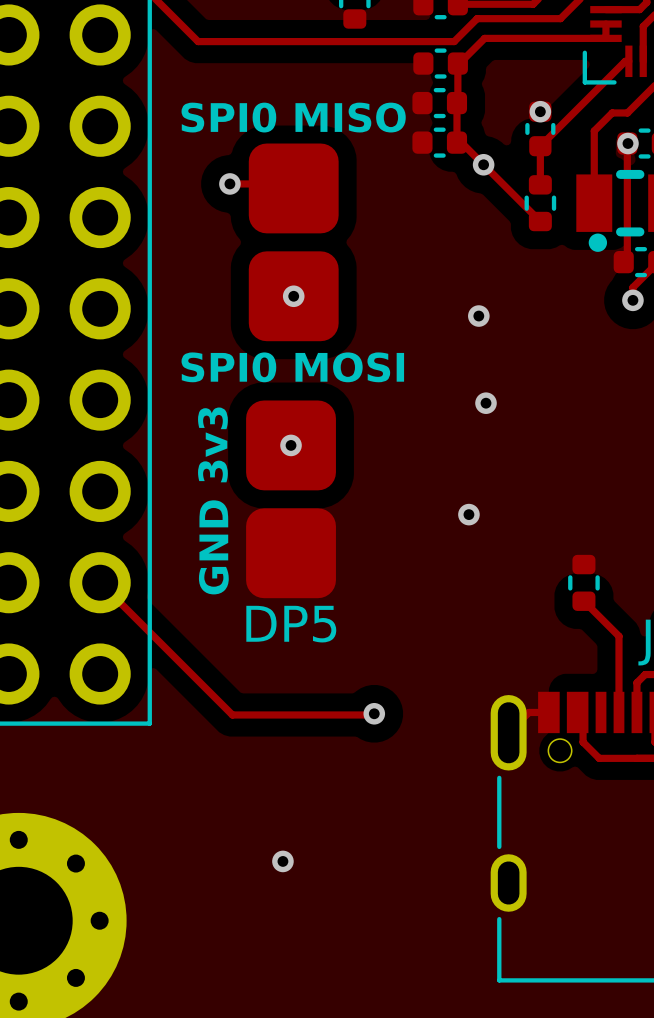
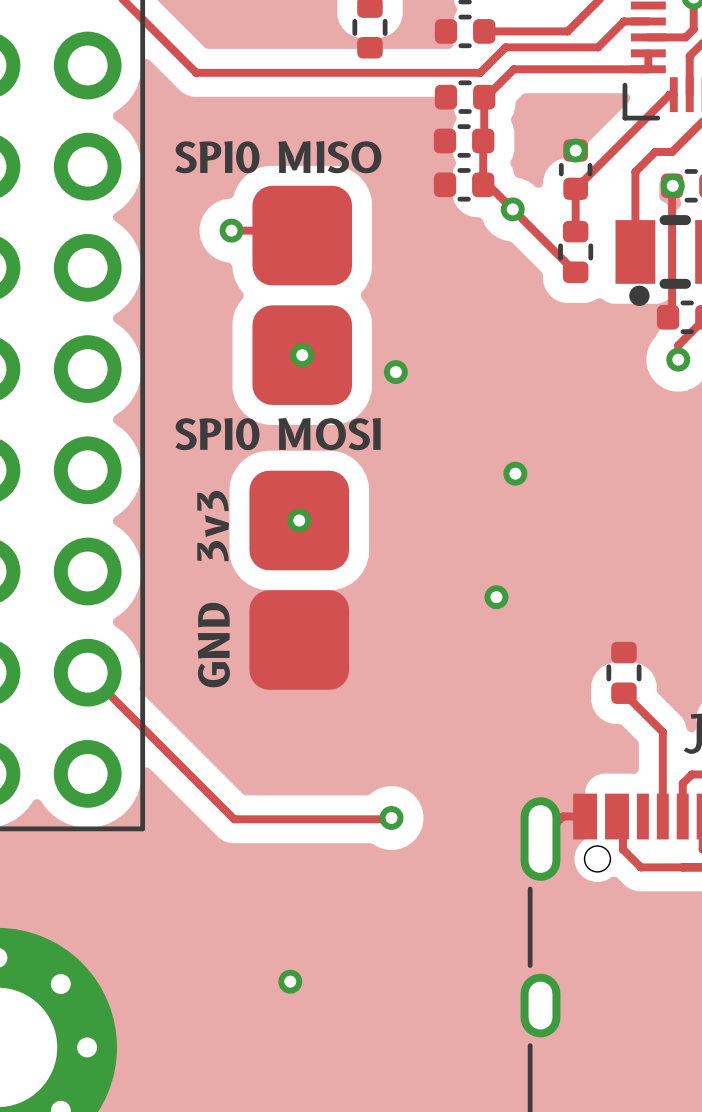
via position: (478, 316) -> (395, 372)
DP5 name: DP5 (291, 624) -> none

